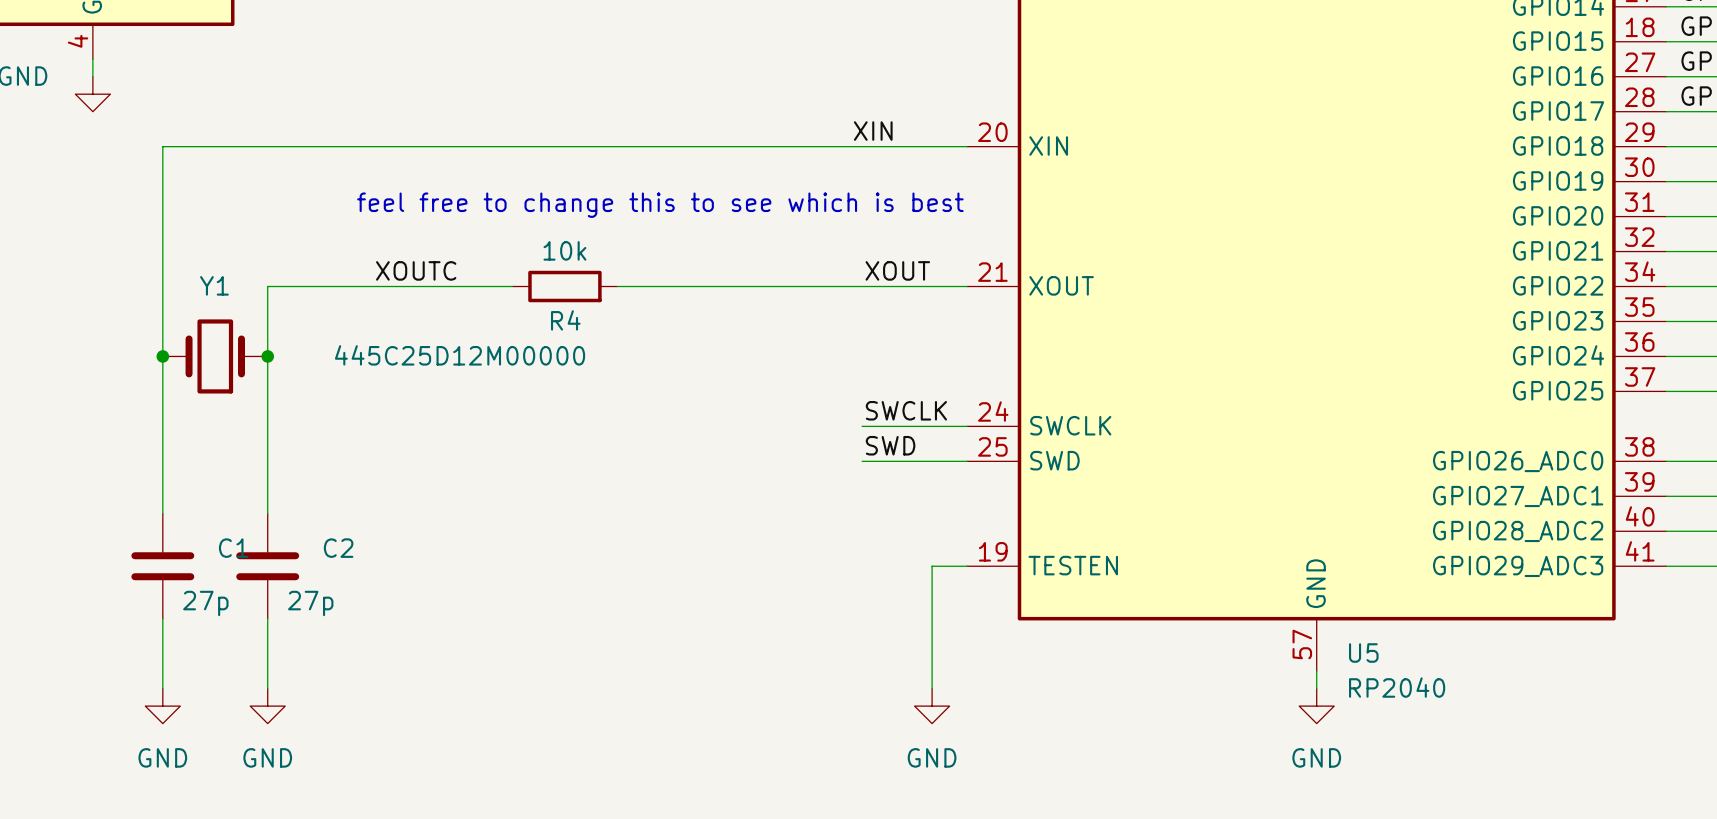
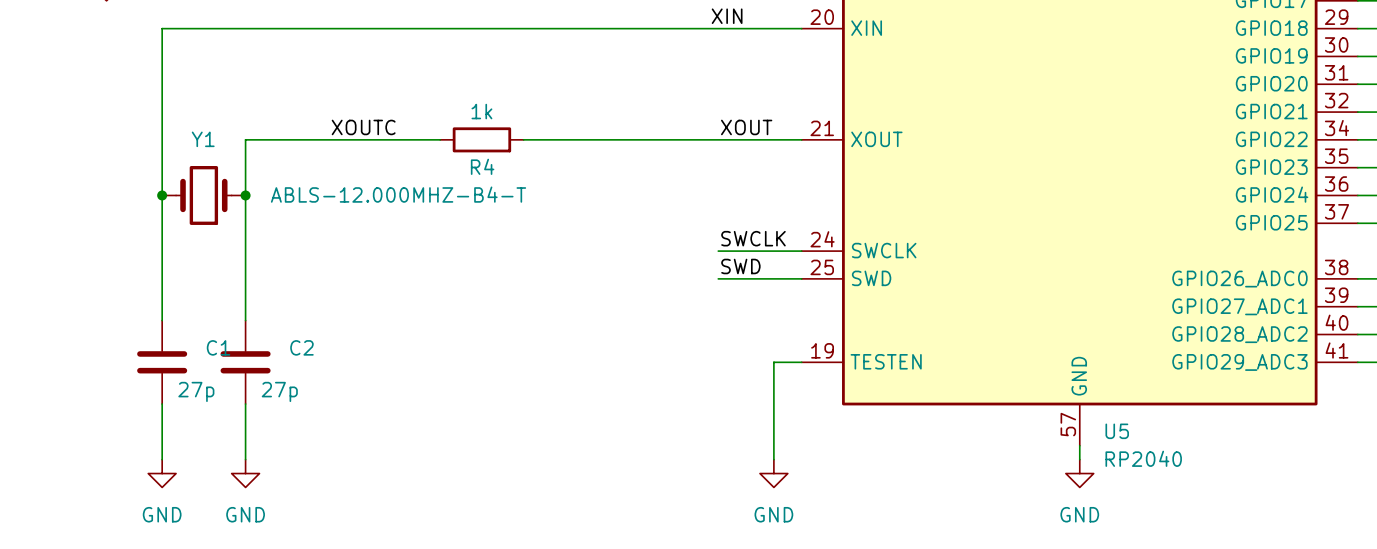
text: feel free to change this to see which is best (660, 205) -> none
R4 value: 10k (564, 250) -> 1k (481, 111)
Y1 value: 445C25D12M00000 (460, 355) -> ABLS-12.000MHZ-B4-T (398, 194)

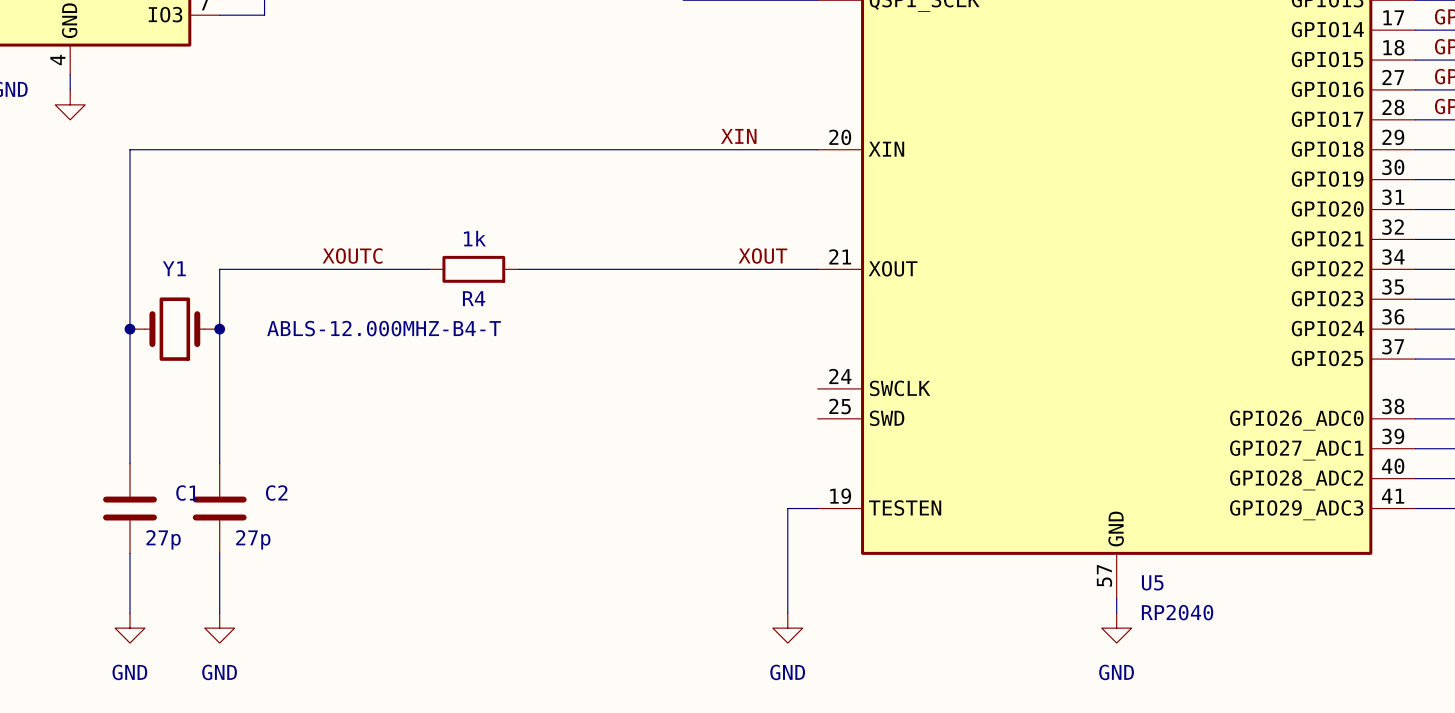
label: SWCLK (753, 238) -> none
wire: (718, 251) (801, 251) -> none
label: SWD (740, 266) -> none
wire: (718, 278) (801, 278) -> none

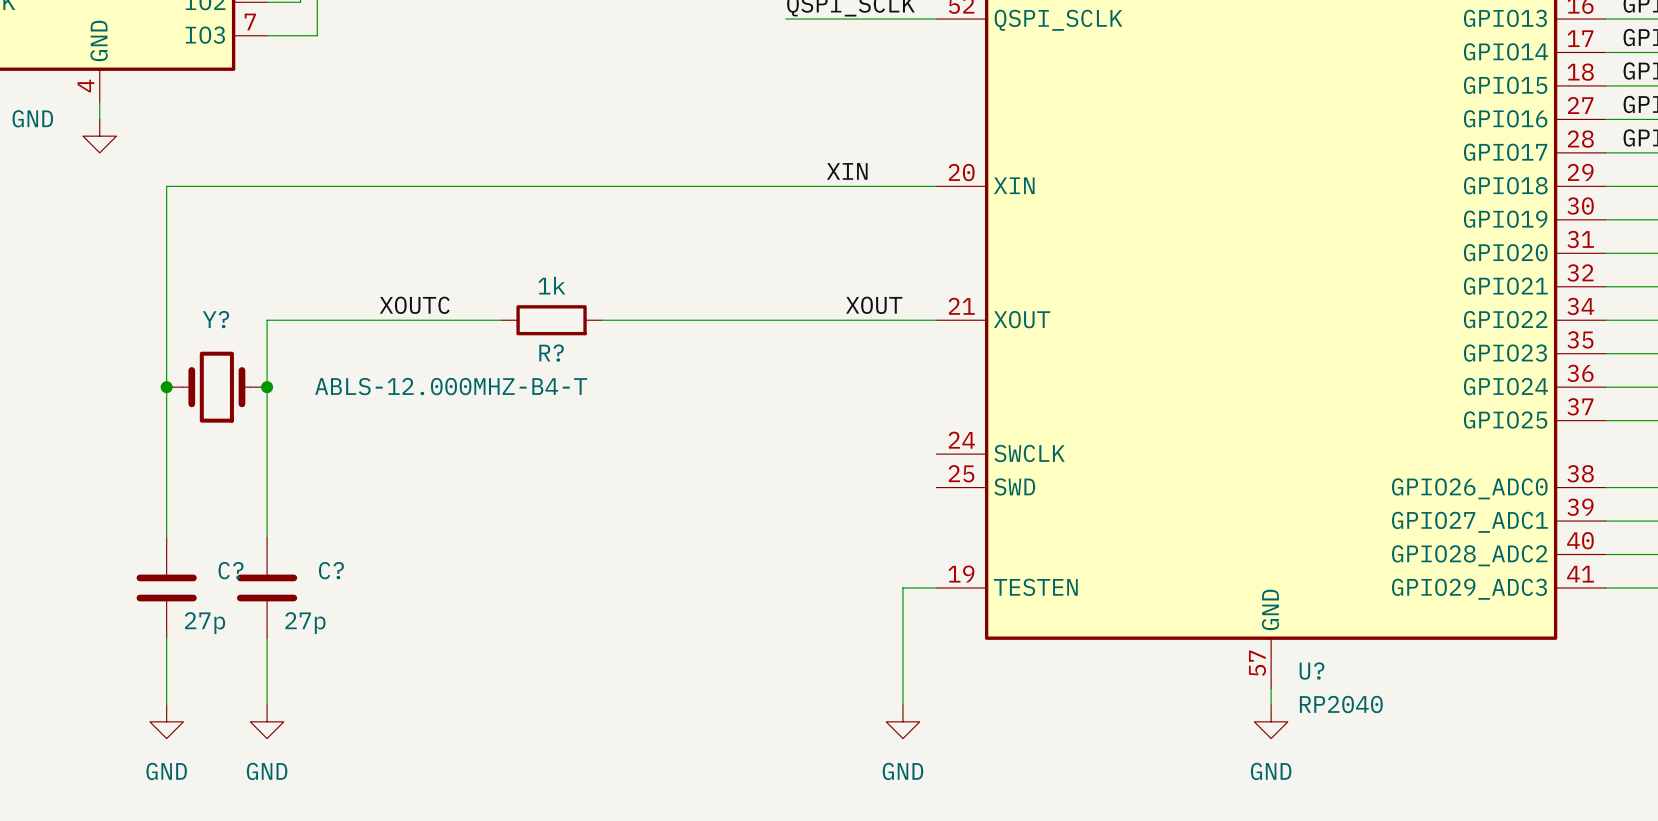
Y1 name: Y1 (174, 268) -> Y? (216, 319)
R4 name: R4 (474, 298) -> R? (551, 353)
C1 name: C1 (187, 493) -> C? (231, 570)
C2 name: C2 (276, 493) -> C? (331, 570)
U5 name: U5 (1152, 582) -> U? (1312, 671)

